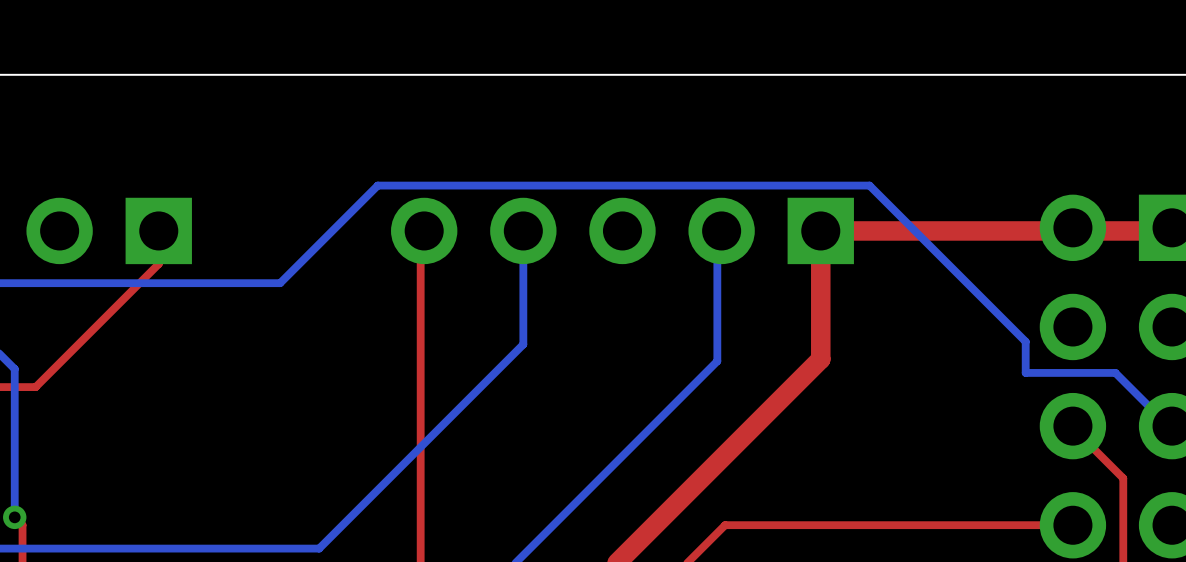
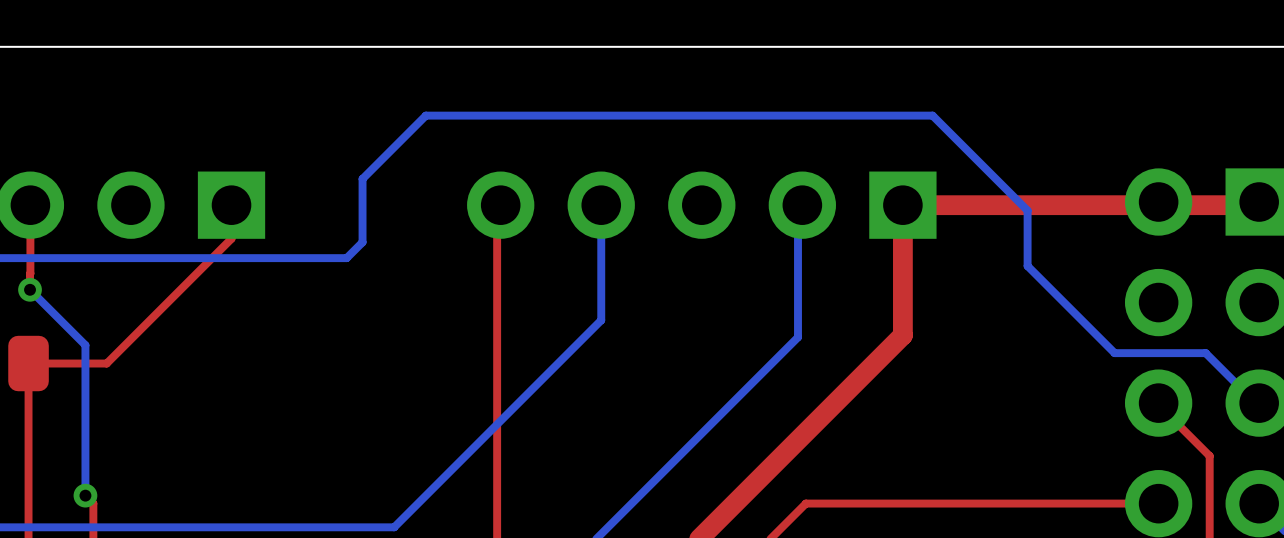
bottom track: (272, 283) (280, 283) (377, 185) (869, 185) (1025, 341) (1025, 372) (1115, 372) (1119, 376) -> (346, 258) (362, 242) (362, 178) (425, 115) (932, 115) (1027, 210) (1027, 266) (1114, 353) (1205, 353)

